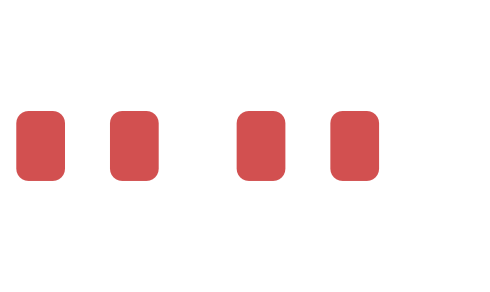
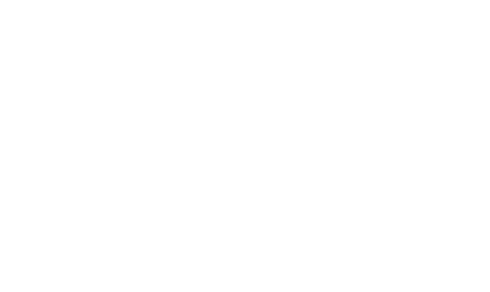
part: (87, 145) -> none
part: (307, 145) -> none

